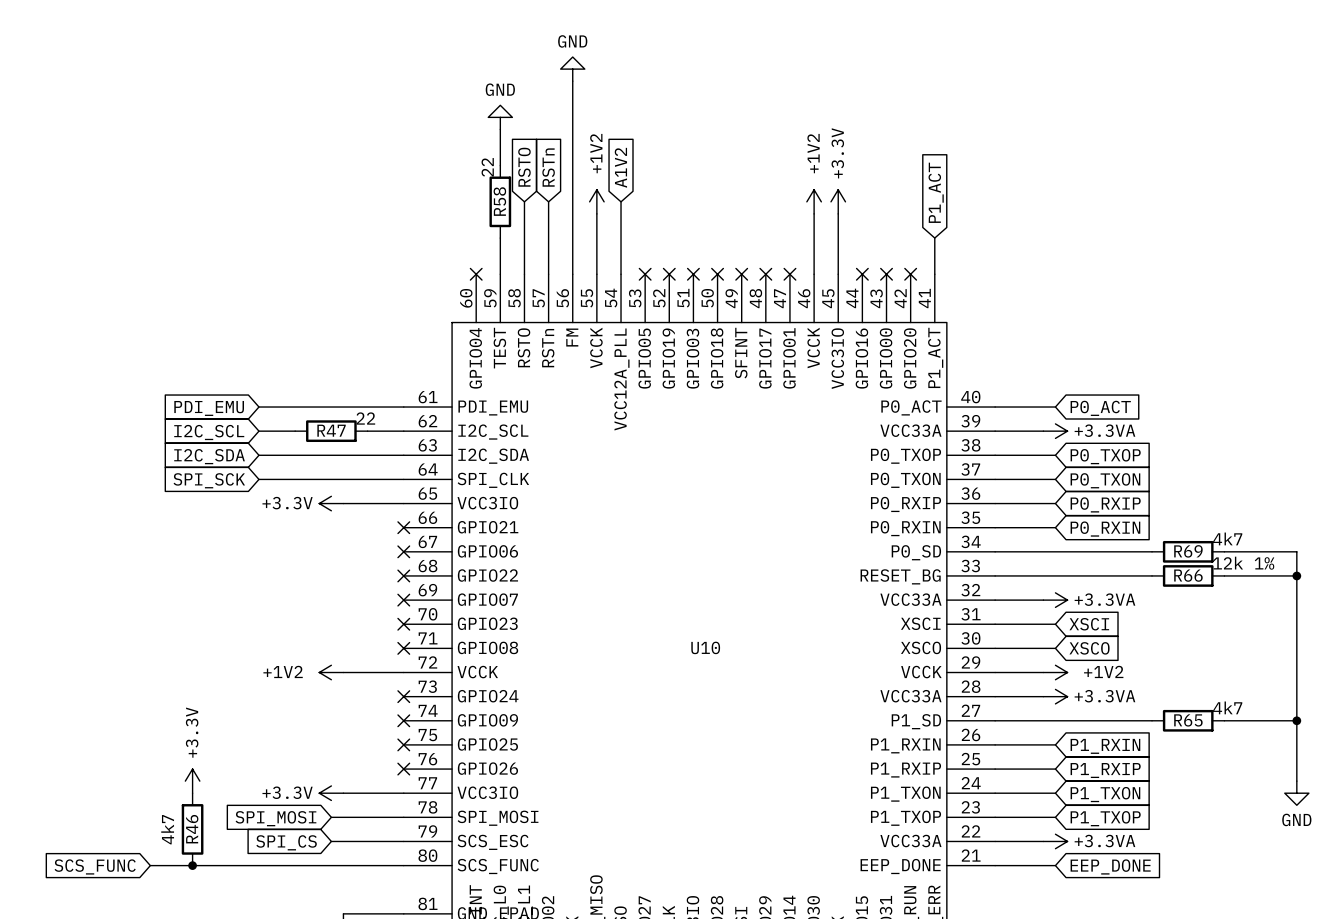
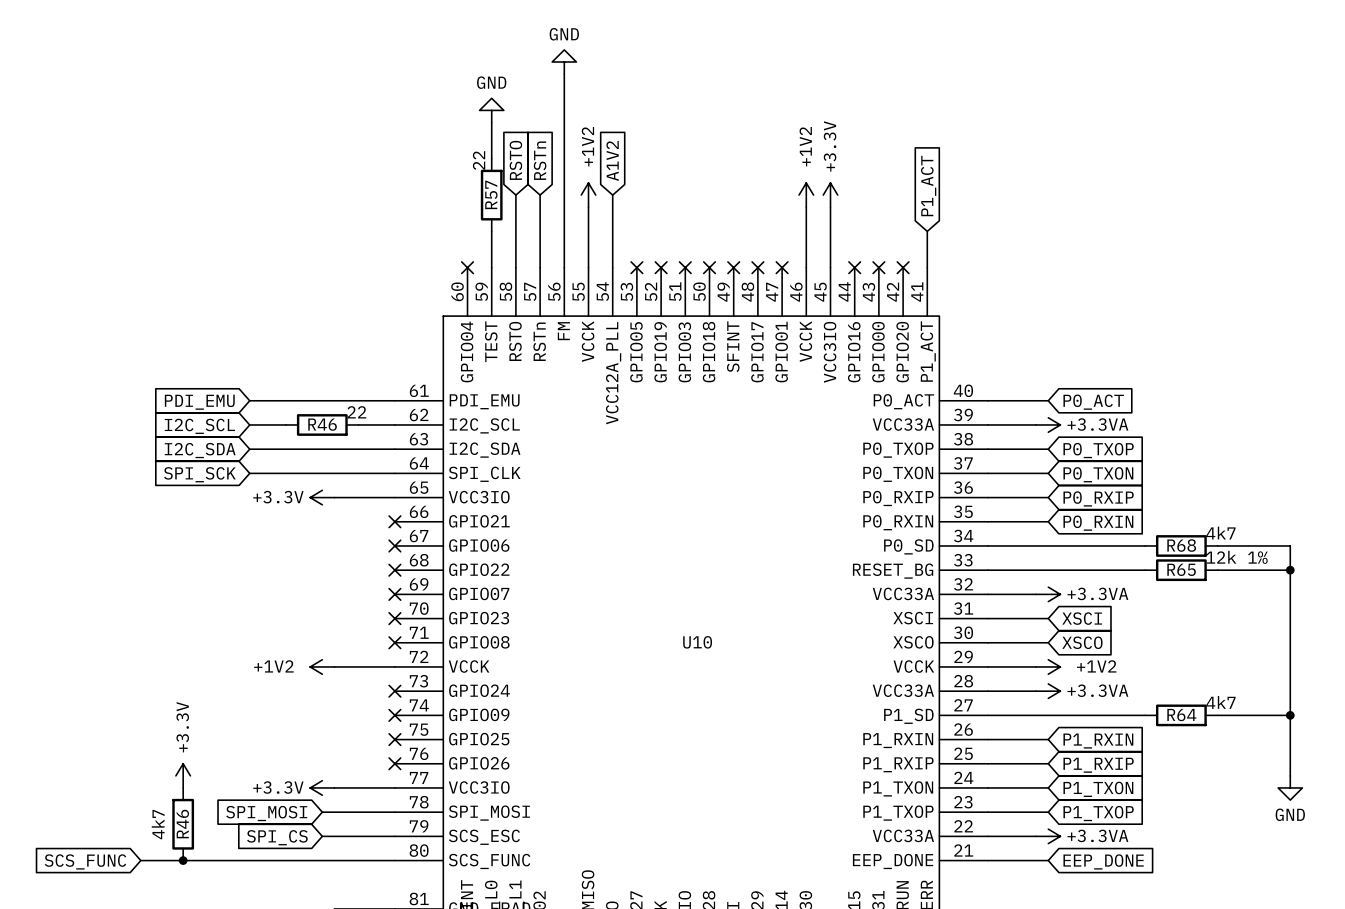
R58 name: R58 (499, 201) -> R57 (491, 194)
R47 name: R47 (331, 430) -> R46 (322, 424)
R69 name: R69 (1188, 551) -> R68 (1181, 545)
R66 name: R66 (1188, 575) -> R65 (1181, 569)
R65 name: R65 (1188, 720) -> R64 (1181, 715)

